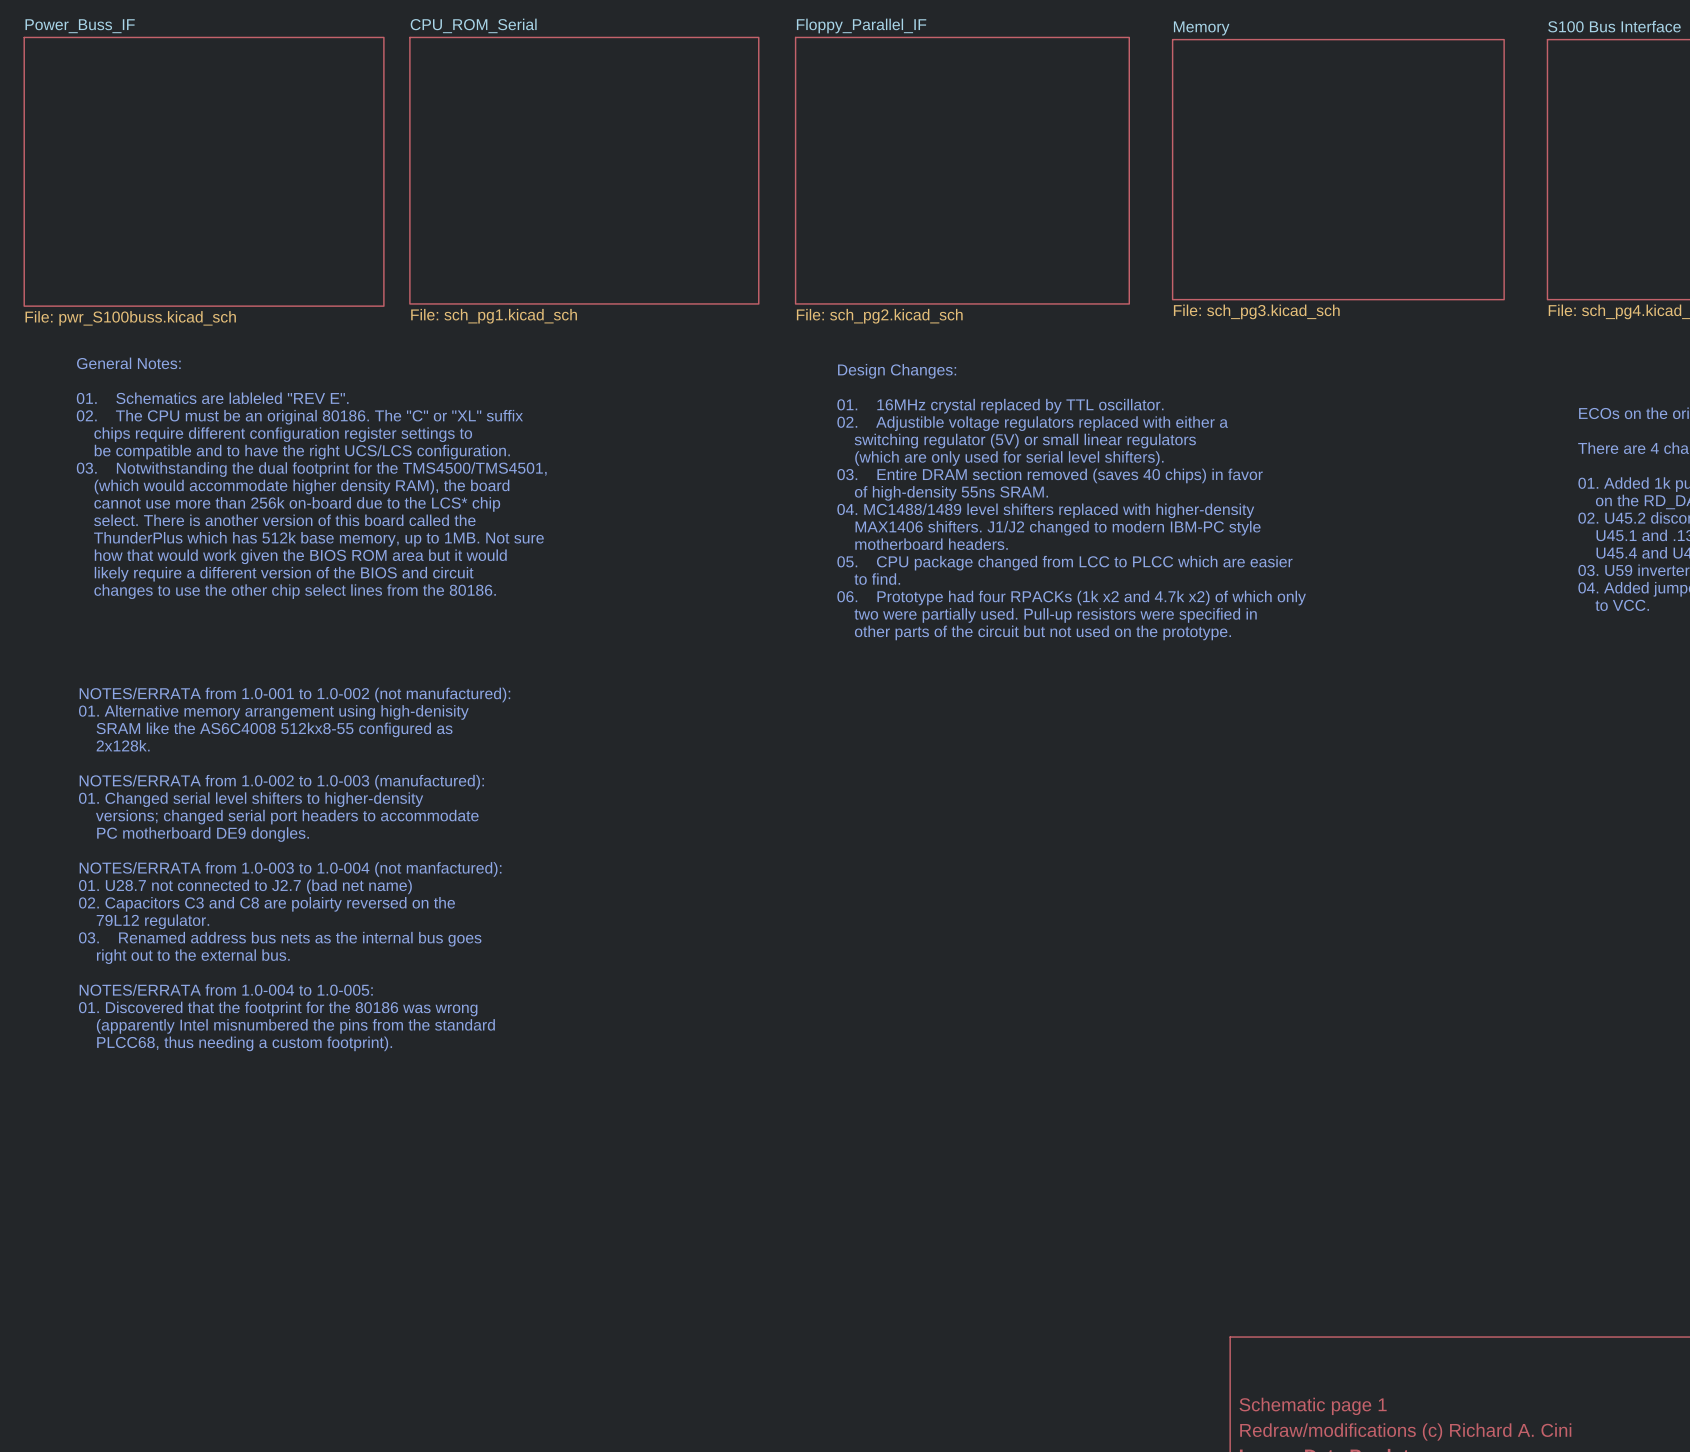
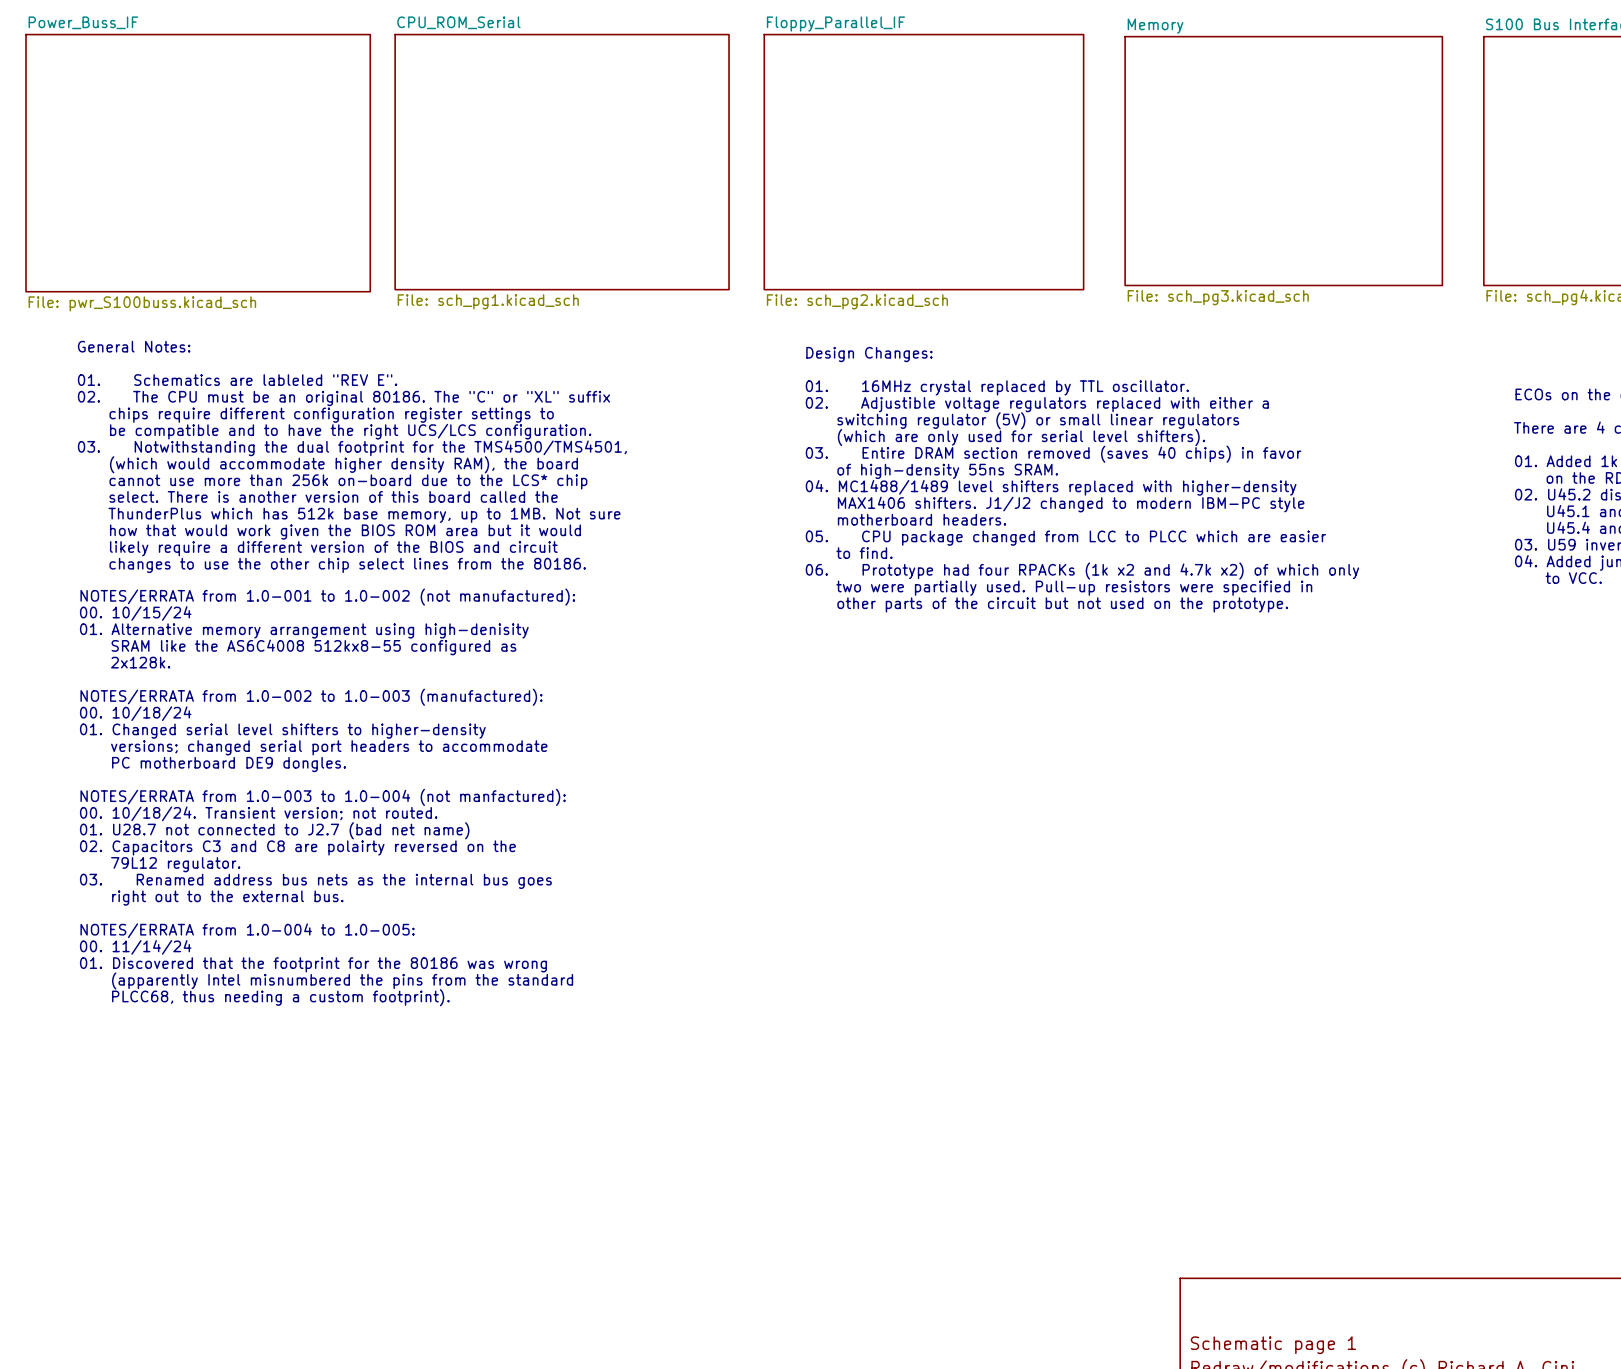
text: none -> NOTES/ERRATA from 1.0-001 to 1.0-002 (not manufactured): (327, 597)
text: none -> 00. 10/15/24 (135, 613)
text: none -> SRAM like the AS6C4008 512kx8-55 configured as (313, 647)
text: NOTES/ERRATA from 1.0-001 to 1.0-002 (not manufactured): (294, 695) -> 2x128k. (140, 662)
text position: 01. Alternative memory arrangement using high-denisity (273, 712) -> 01. Alternative memory arrangement using high-denisity (304, 630)
text: SRAM like the AS6C4008 512kx8-55 configured as (274, 729) -> NOTES/ERRATA from 1.0-002 to 1.0-003 (manufactured): (311, 697)
text: 2x128k. (123, 745) -> 00. 10/18/24 (135, 713)
text: none -> 01. Changed serial level shifters to higher-density (282, 731)
text: NOTES/ERRATA from 1.0-002 to 1.0-003 (manufactured): (281, 782) -> versions; changed serial port headers to accommodate (329, 747)
text: 01. Changed serial level shifters to higher-density (251, 799) -> PC motherboard DE9 dongles. (229, 764)
text: versions; changed serial port headers to accommodate (287, 817) -> none
text: PC motherboard DE9 dongles. (203, 834) -> NOTES/ERRATA from 1.0-003 to 1.0-004 (not manfactured): (323, 797)
text: none -> 00. 10/18/24. Transient version; not routed. (258, 813)
text: NOTES/ERRATA from 1.0-003 to 1.0-004 (not manfactured): (290, 869) -> 01. U28.7 not connected to J2.7 (bad net name) (274, 830)
text: 01. U28.7 not connected to J2.7 (bad net name) (245, 886) -> 02. Capacitors C3 and C8 are polairty reversed on the (297, 847)
text: 02. Capacitors C3 and C8 are polairty reversed on the (266, 904) -> 79L12 regulator. (175, 864)
text: 79L12 regulator. (152, 921) -> 03. Renamed address bus nets as the internal bus goes (315, 881)
text: 03. Renamed address bus nets as the internal bus goes (280, 939) -> right out to the external bus. (227, 898)
text: right out to the external bus. (193, 956) -> none
text: none -> NOTES/ERRATA from 1.0-004 to 1.0-005: (247, 930)
text: NOTES/ERRATA from 1.0-004 to 1.0-005: (226, 989) -> 00. 11/14/24 (135, 947)

